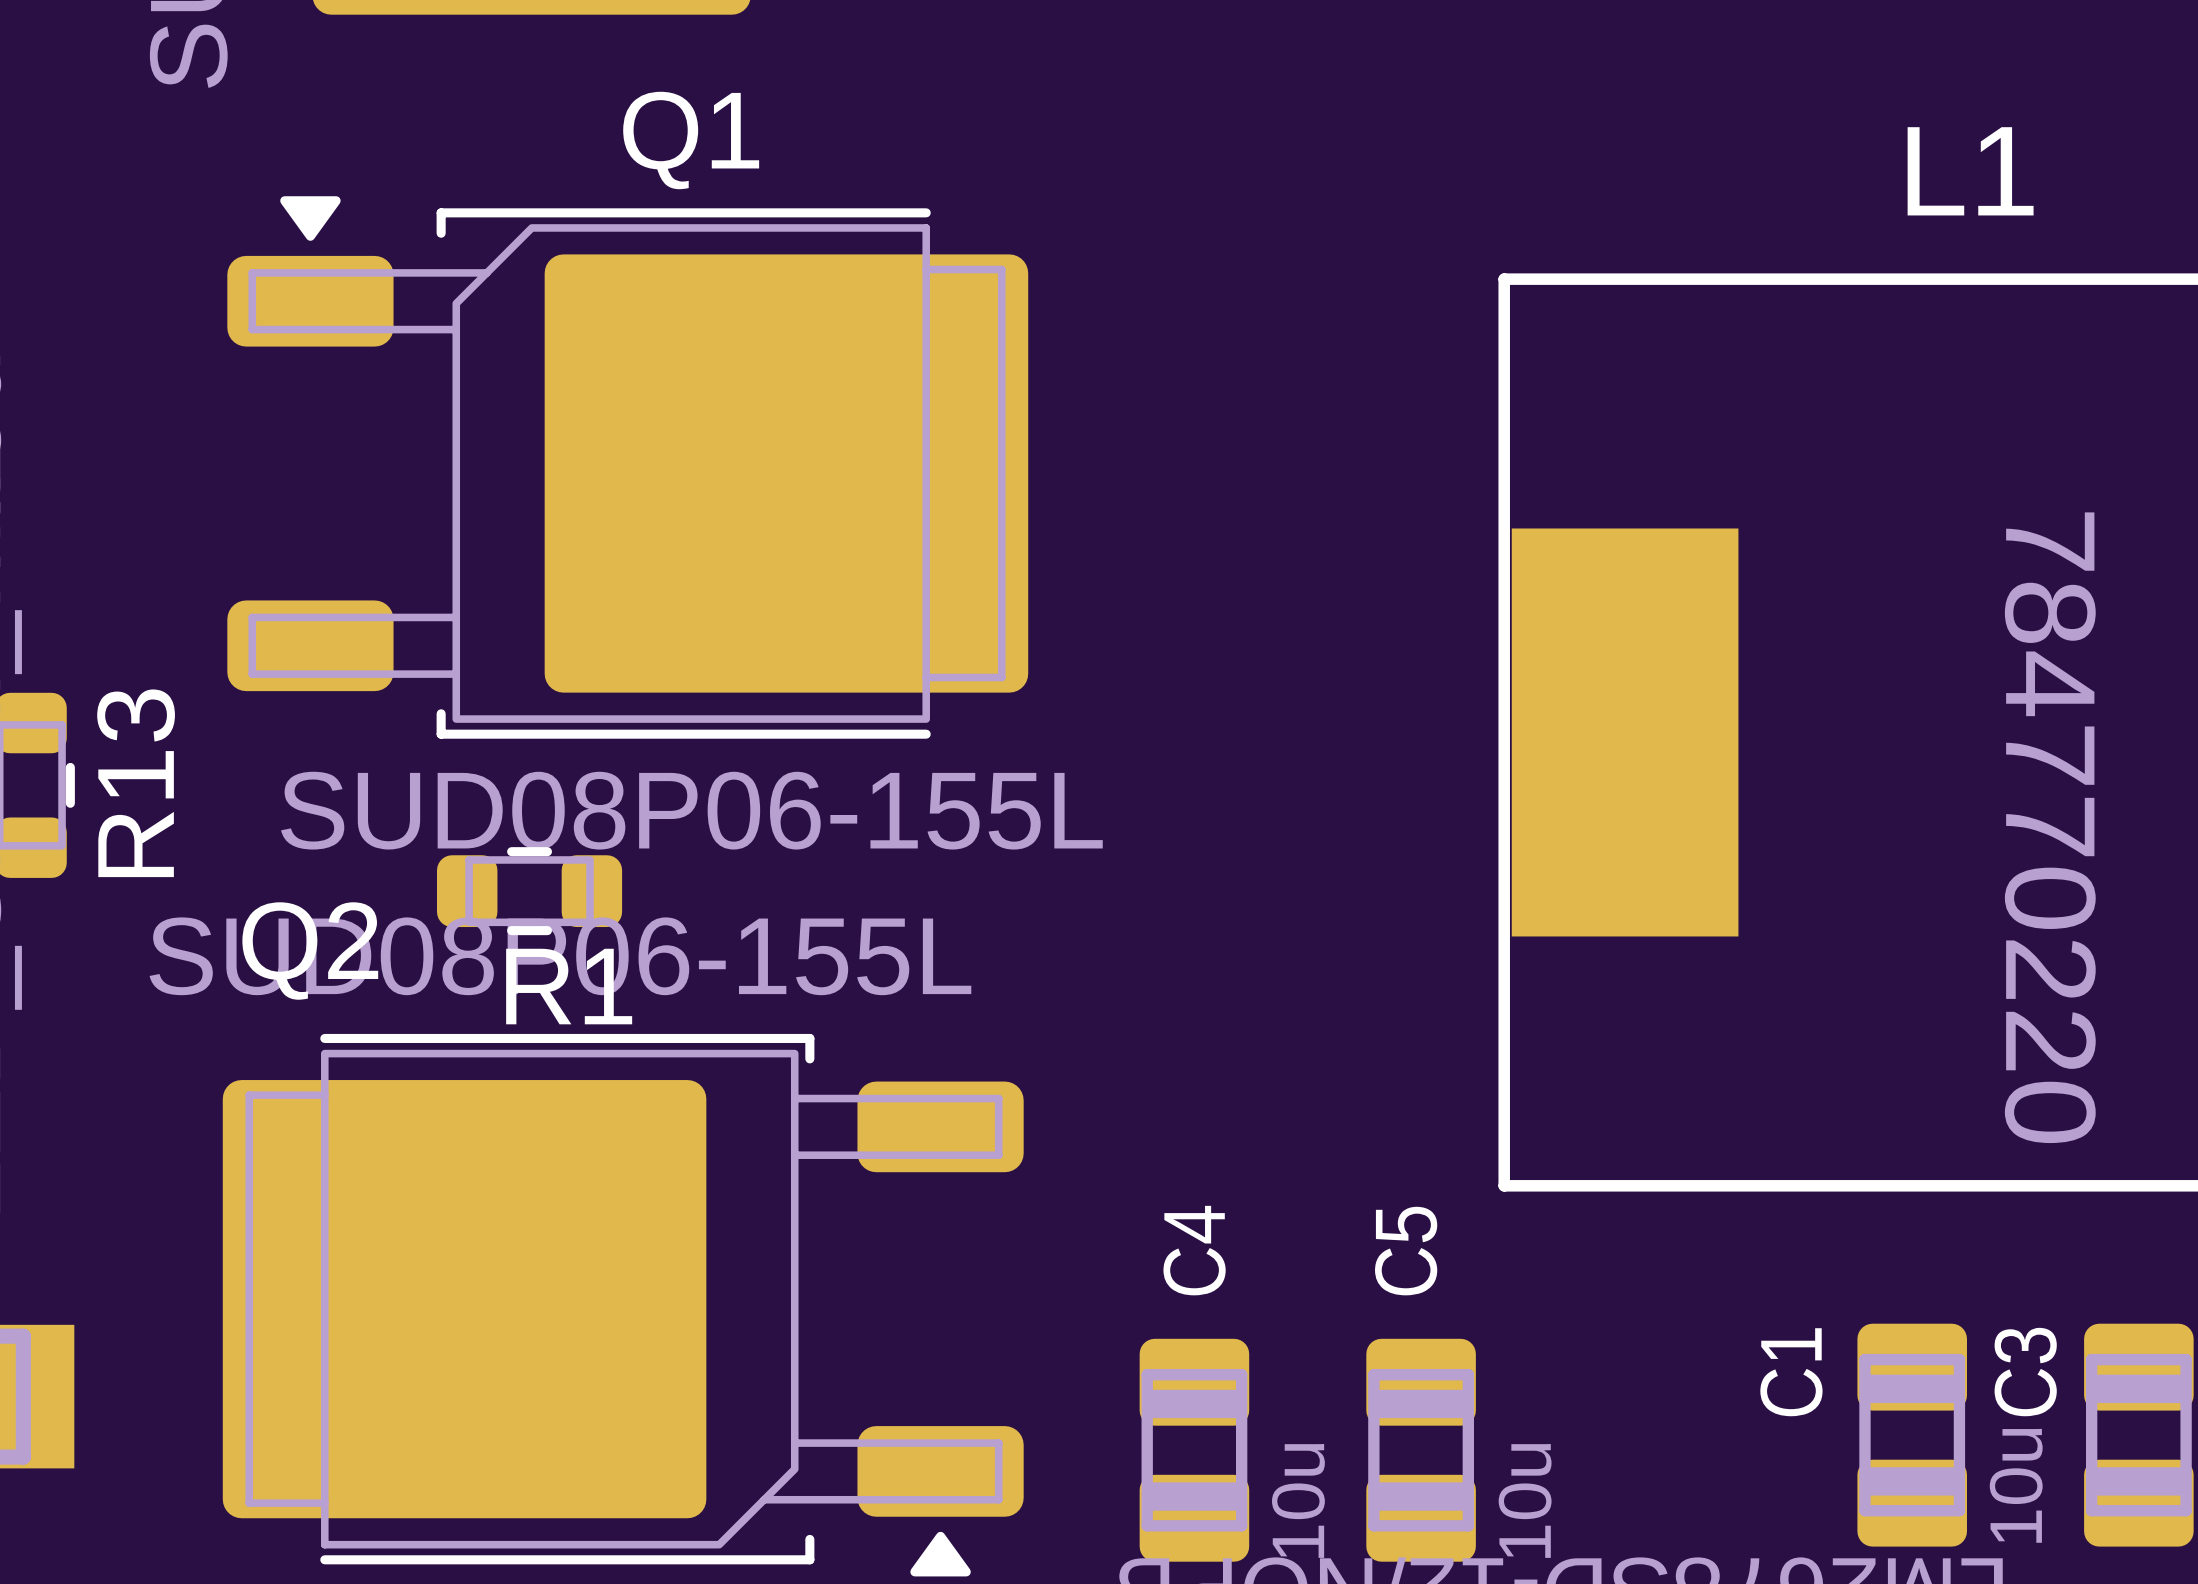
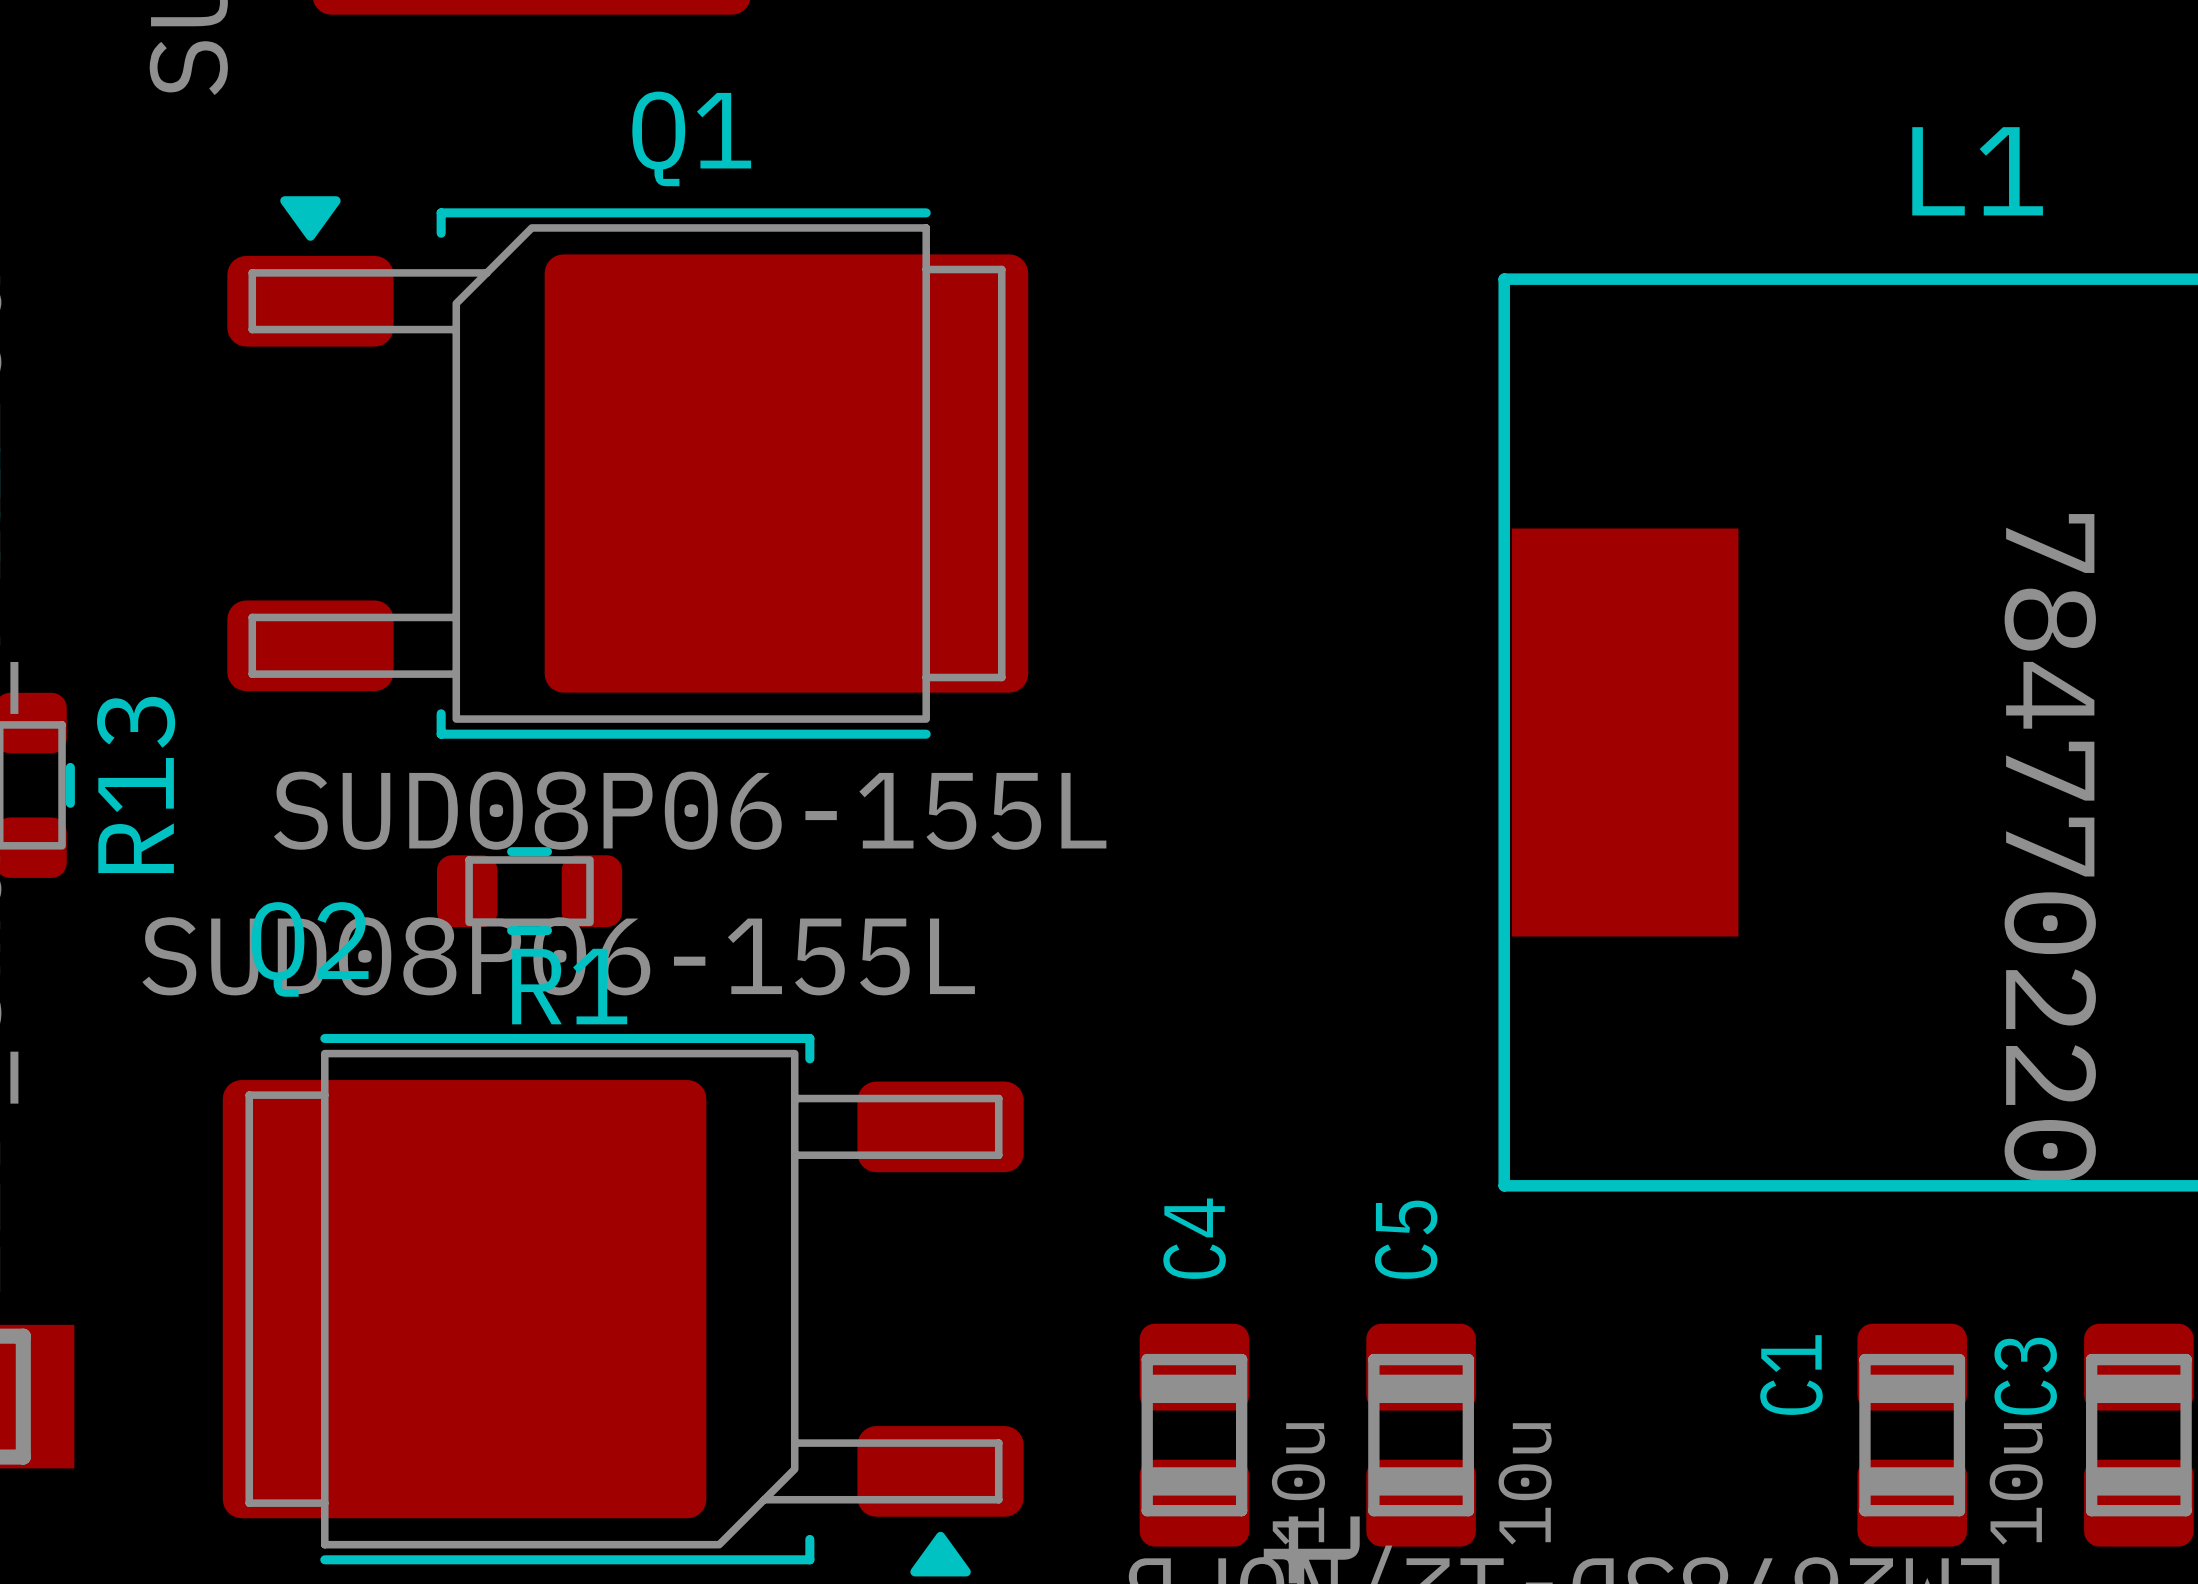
C4 position: (1194, 1450) -> (1194, 1435)
C5 position: (1421, 1450) -> (1421, 1435)

